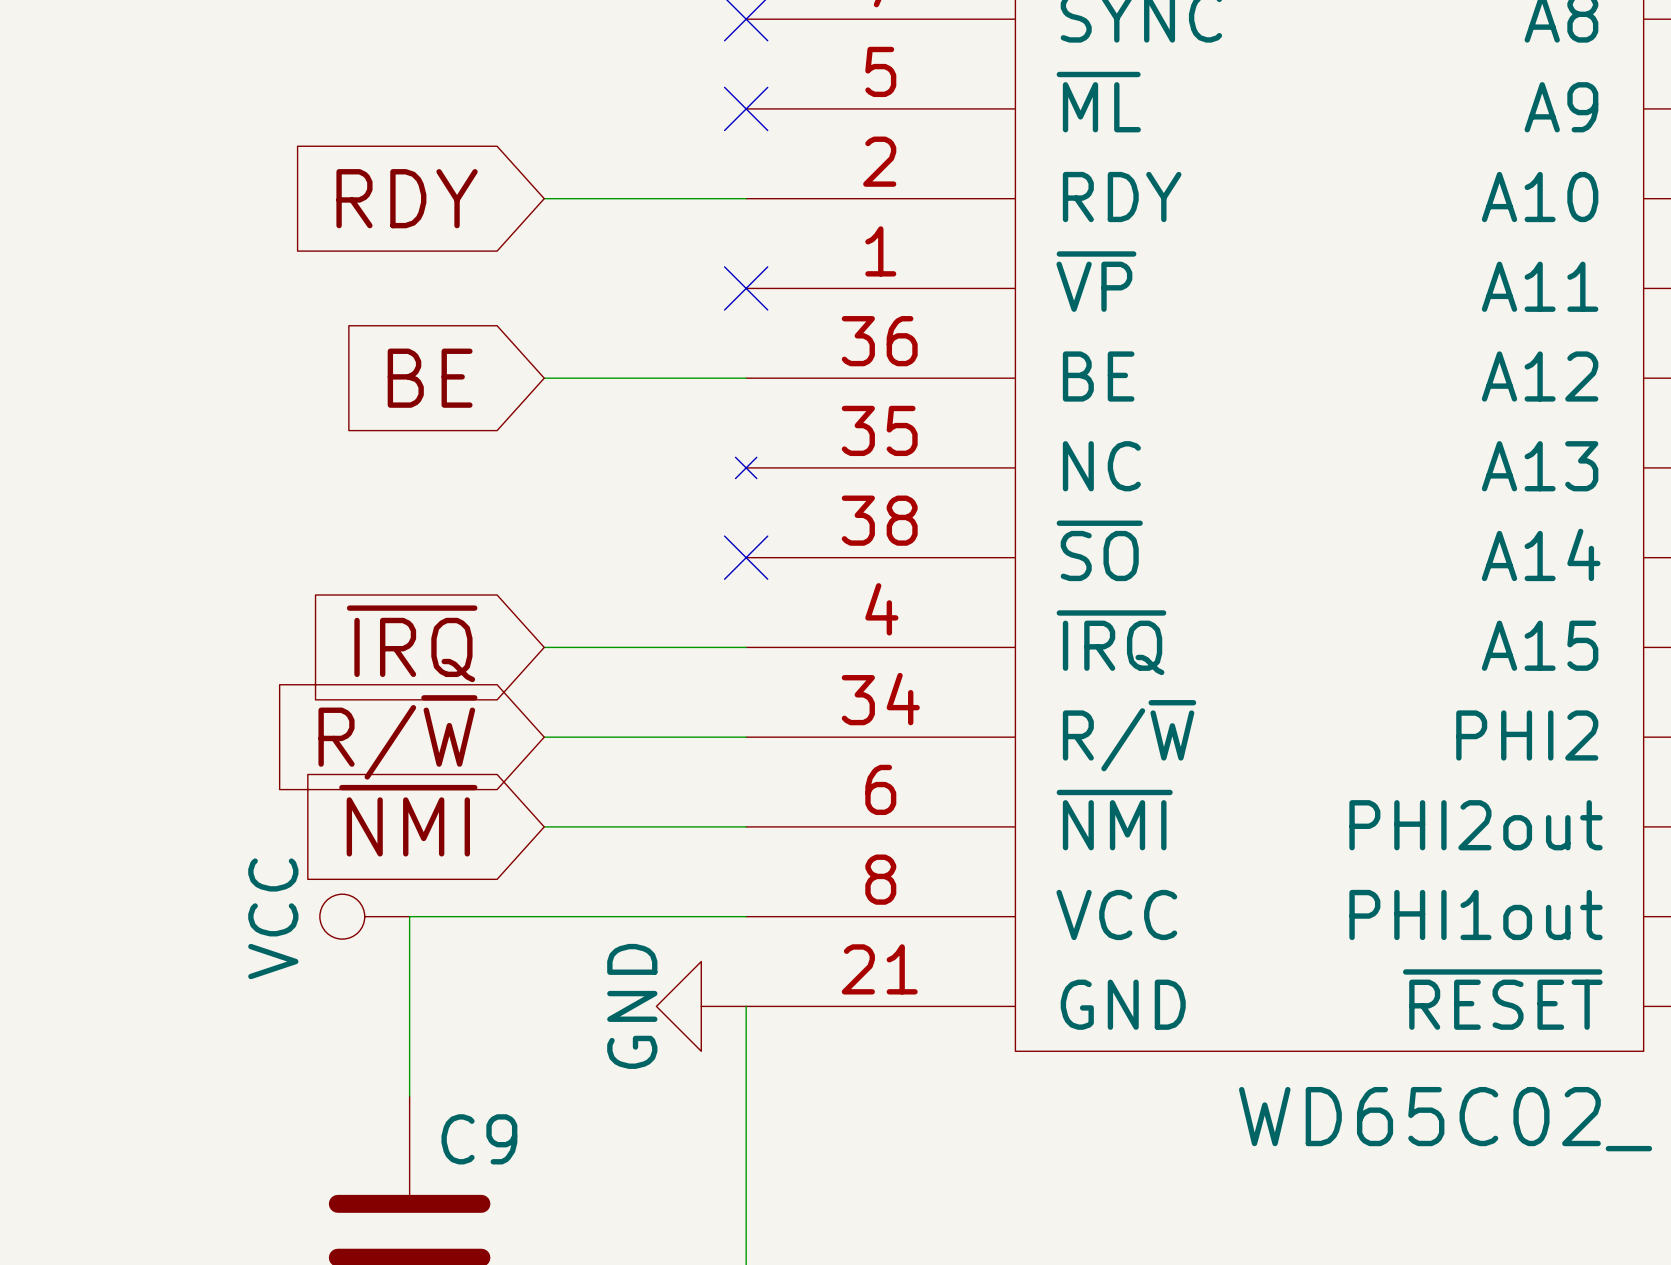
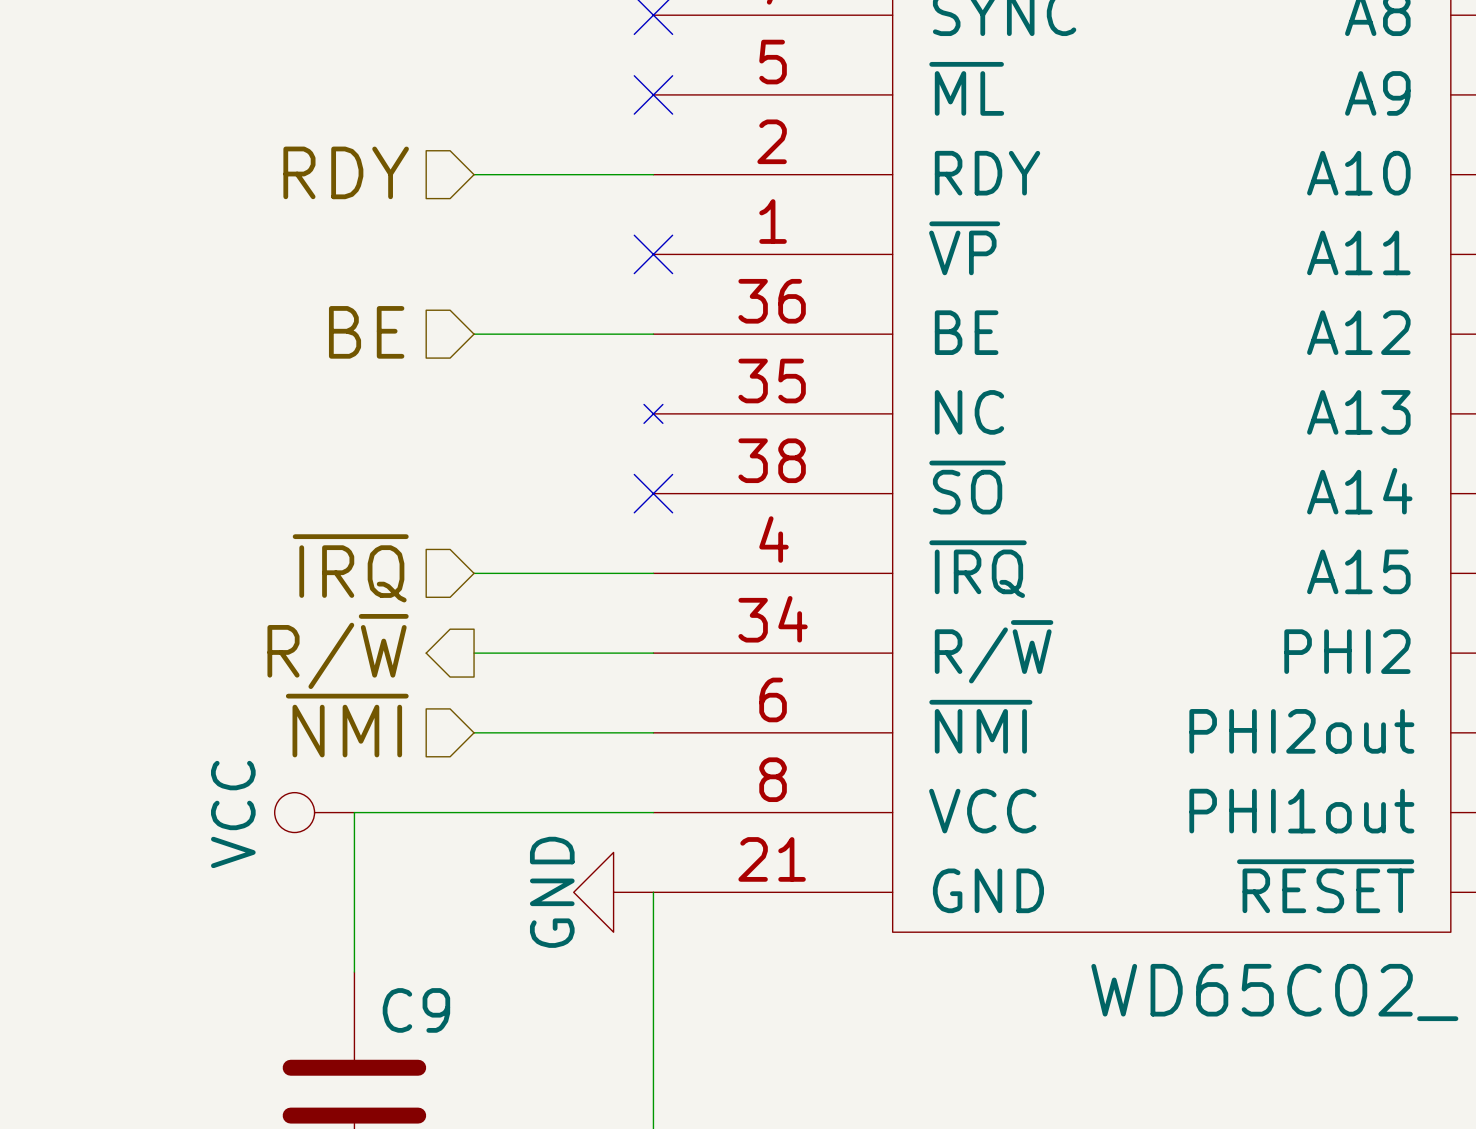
hierarchical label: none -> RDY (346, 172)
global label: RDY (407, 198) -> none
hierarchical label: none -> BE (366, 332)
global label: BE (430, 378) -> none
hierarchical label: none -> ~{IRQ} (350, 568)
global label: ~{IRQ} (412, 643) -> none
hierarchical label: none -> R/~{W} (338, 651)
global label: R/~{W} (397, 737) -> none
hierarchical label: none -> ~{NMI} (347, 725)
global label: ~{NMI} (408, 820) -> none

